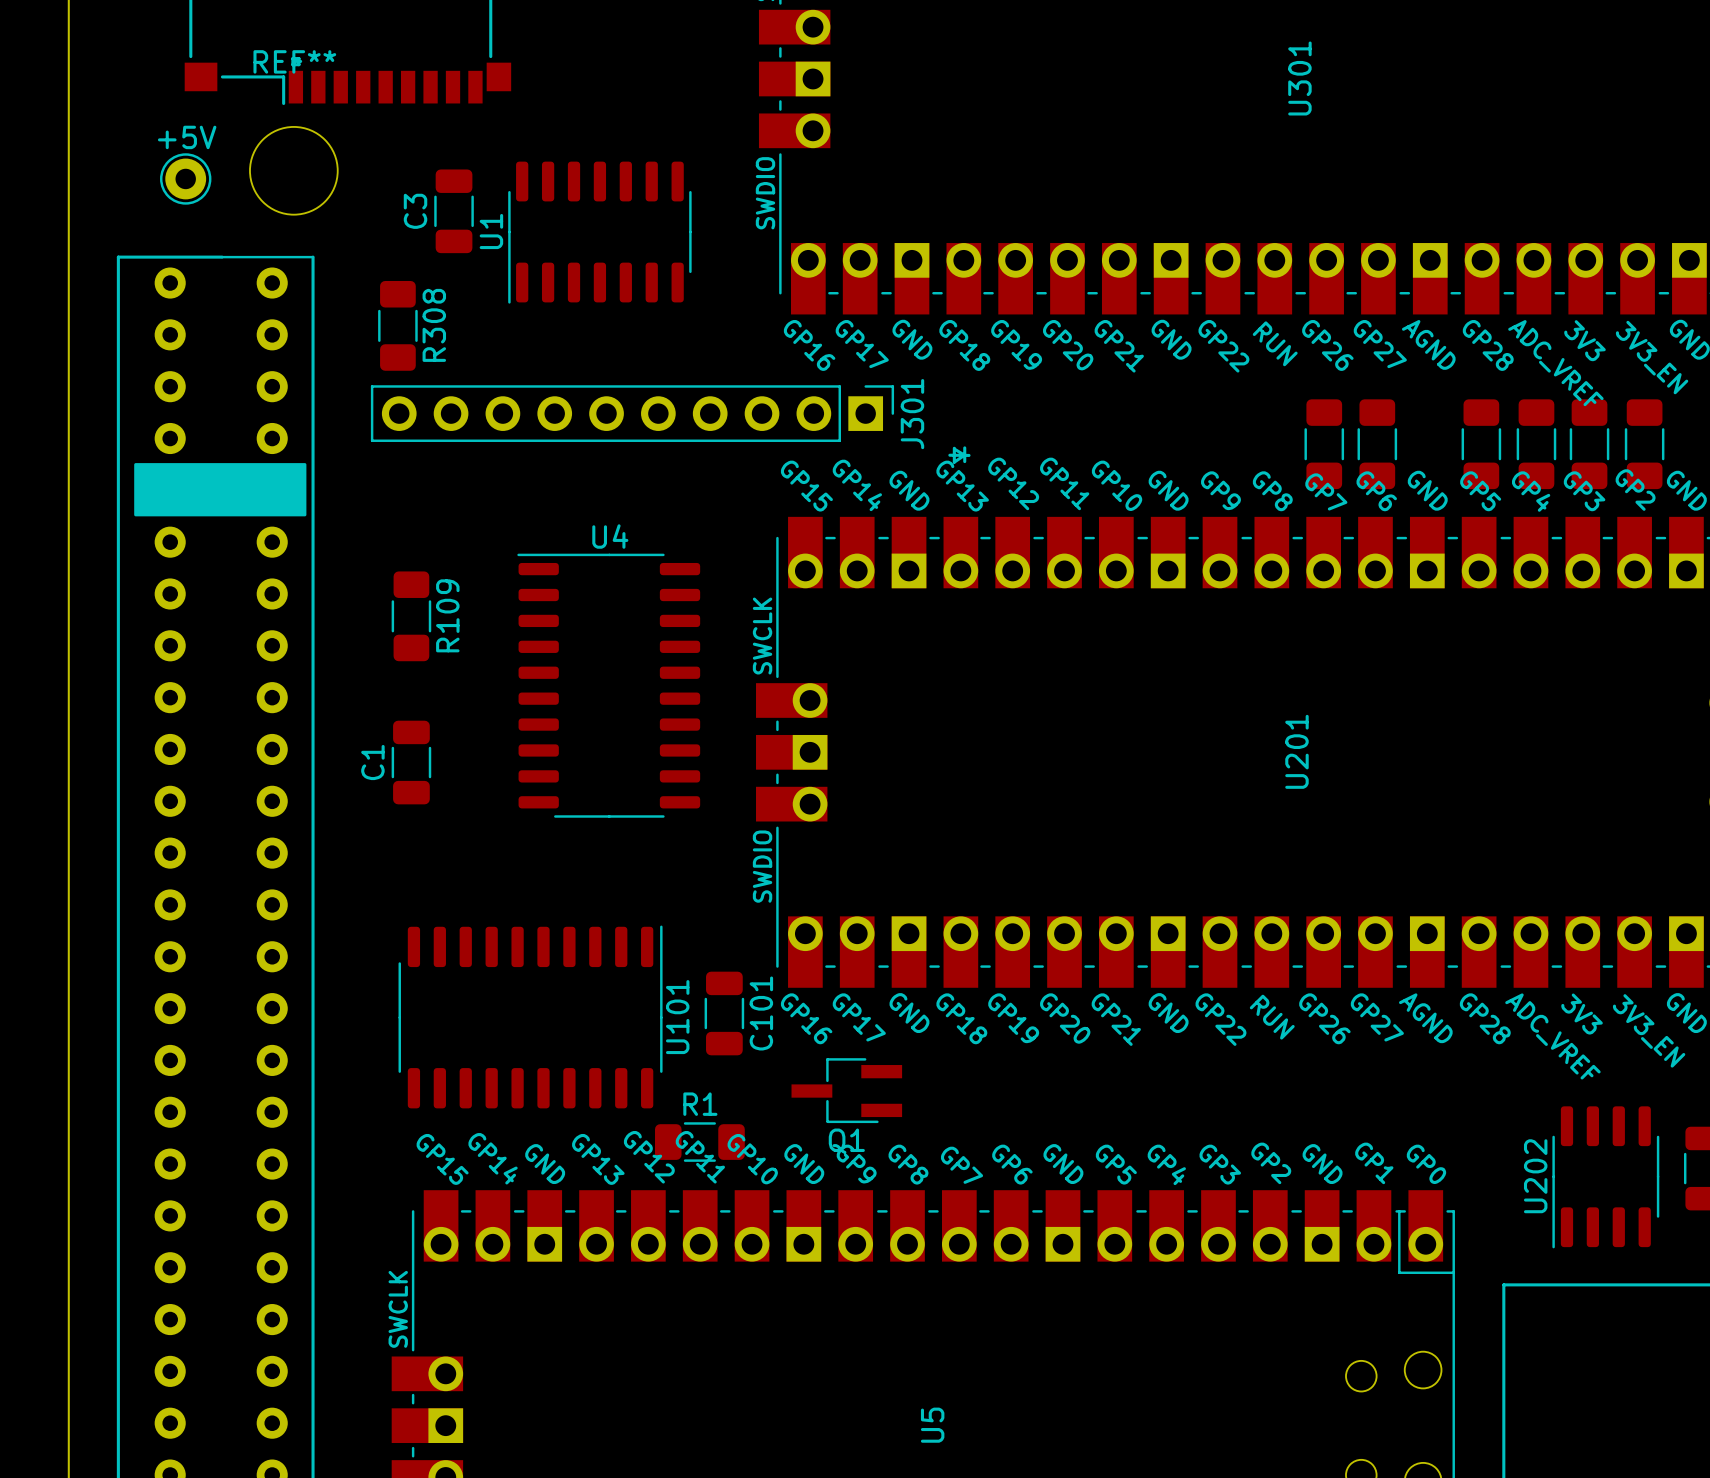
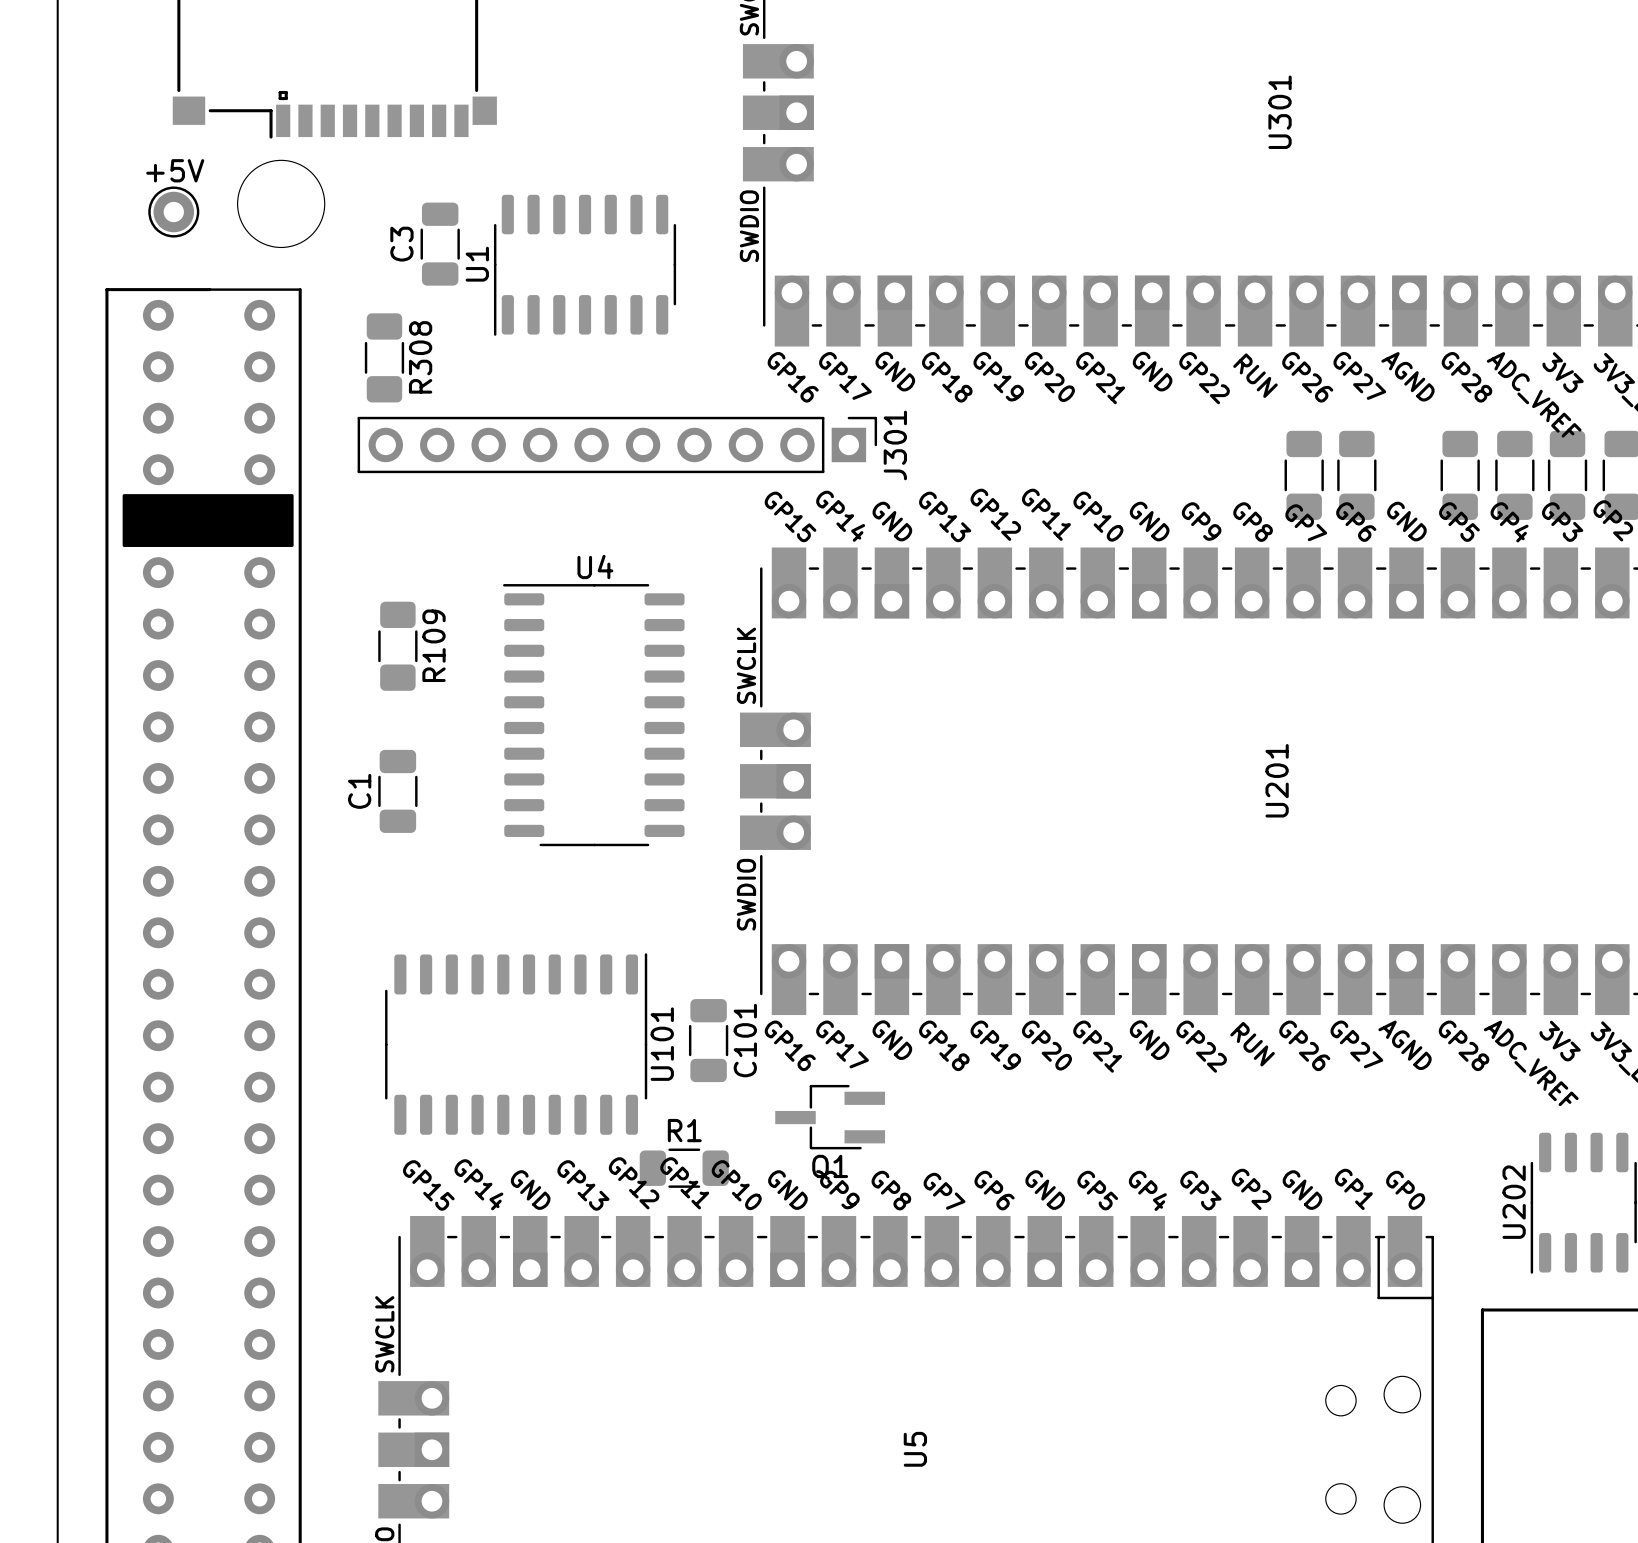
REF** name: REF** (294, 61) -> none
line: (964, 447) (964, 461) -> none
line: (954, 448) (954, 462) (964, 455) (954, 449) -> none
line: (949, 455) (969, 455) -> none

